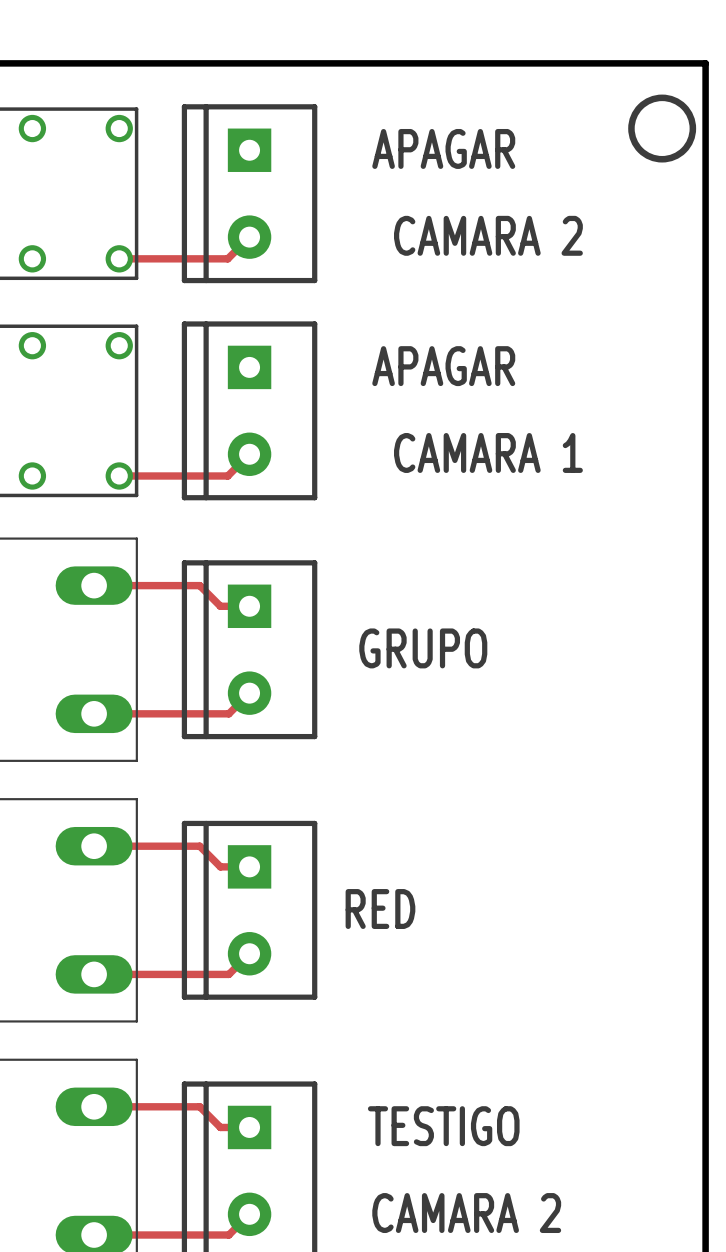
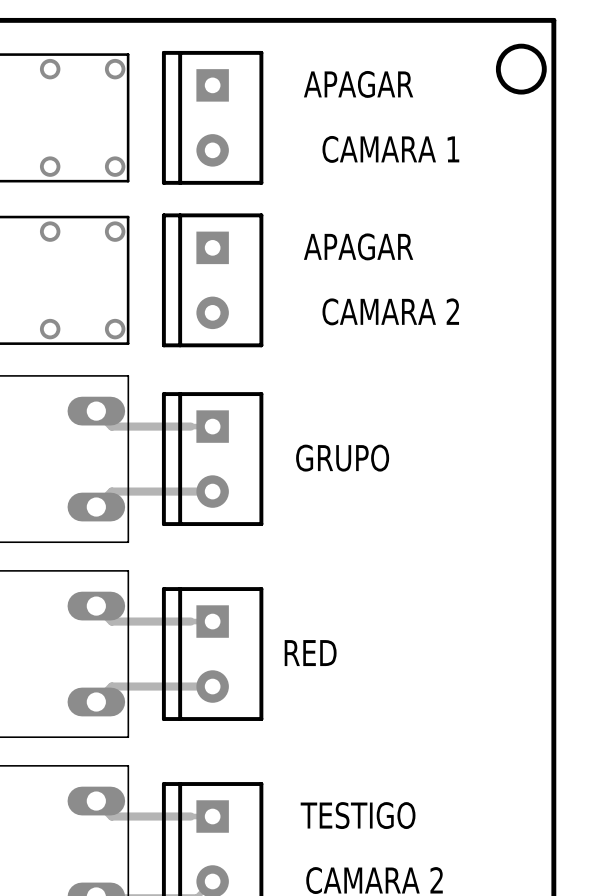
text: CAMARA 2 (488, 235) -> CAMARA 1 (390, 149)
track: (249, 237) (227, 258) (119, 258) -> none
text: CAMARA 1 (488, 452) -> CAMARA 2 (390, 311)
track: (249, 454) (227, 475) (119, 475) -> none
track: (94, 585) (199, 585) (220, 606) -> (96, 411) (111, 426) (190, 426)
track: (249, 693) (228, 713) (94, 713) -> (212, 491) (111, 491) (96, 507)
track: (94, 846) (199, 846) (220, 866) -> (96, 606) (111, 621) (190, 621)
track: (249, 953) (228, 974) (94, 974) -> (212, 686) (111, 686) (96, 702)
track: (94, 1106) (199, 1106) (220, 1127) -> (96, 801) (111, 816) (190, 816)

